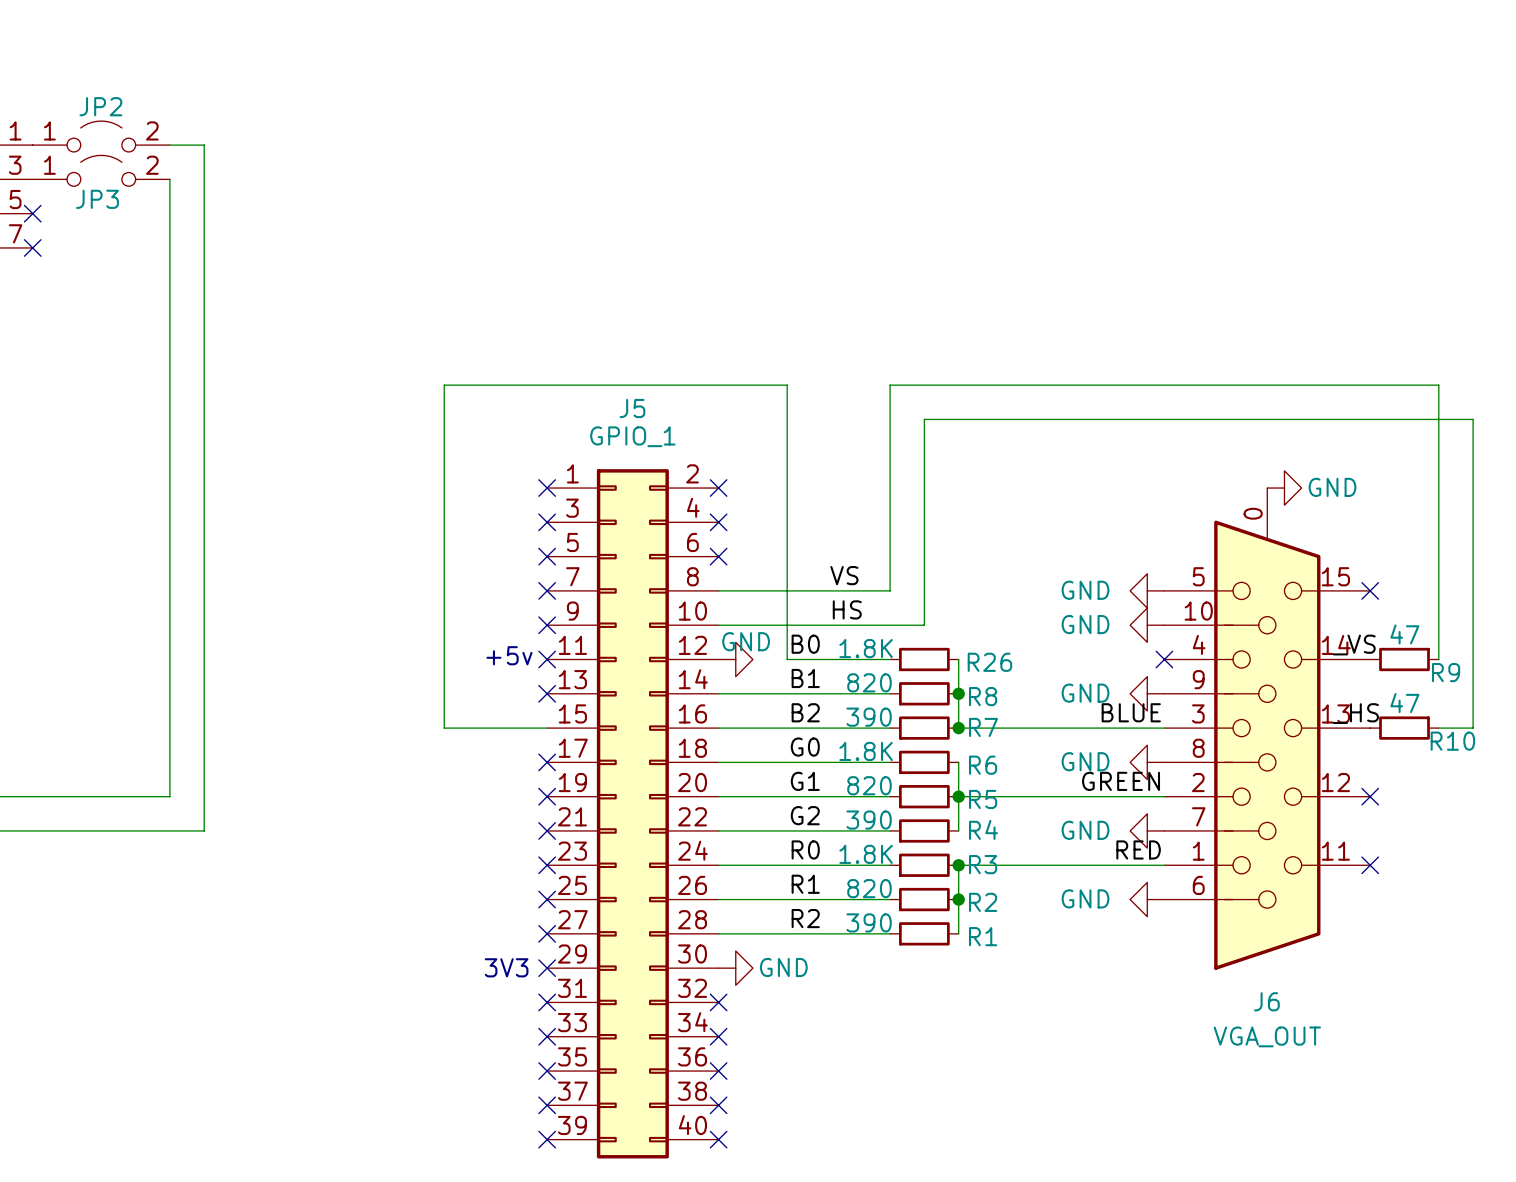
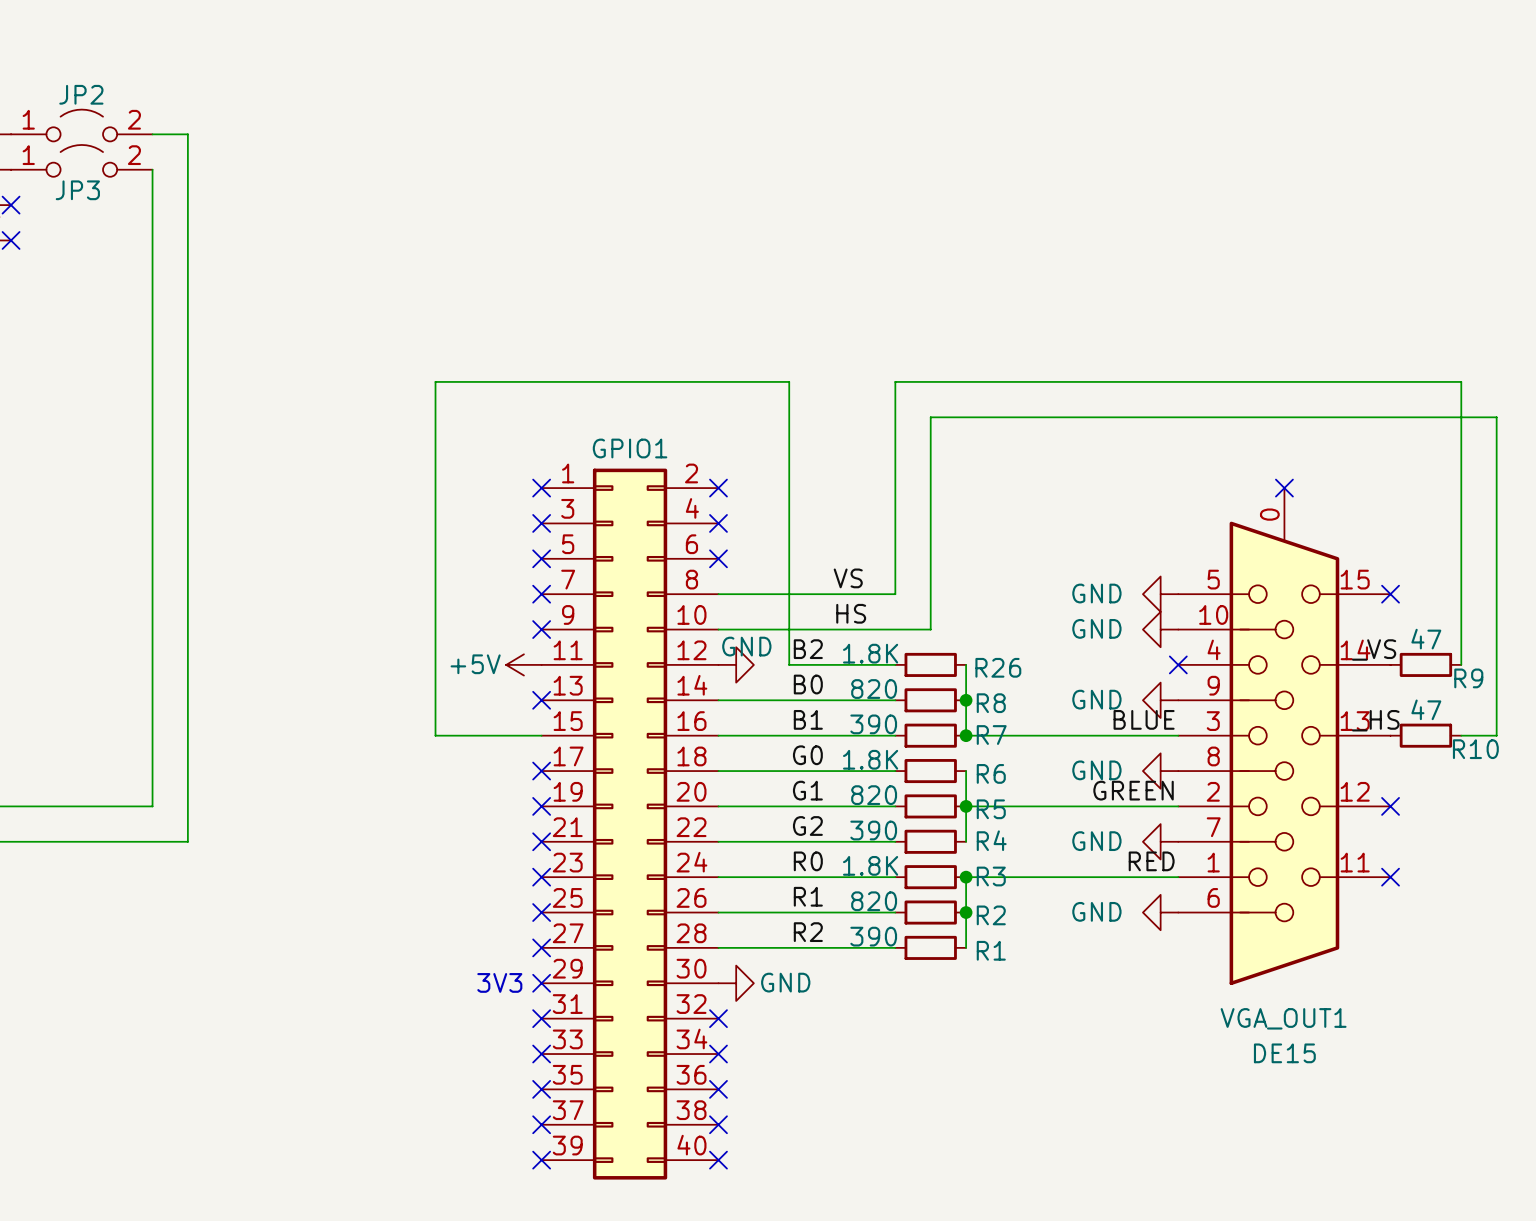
J5 name: J5 (632, 408) -> GPIO1 (630, 448)
J5 value: GPIO_1 (632, 436) -> none
no-connect mark: none -> (1284, 488)
power symbol: GND (1284, 488) -> none
label: B0 (805, 644) -> B2 (808, 649)
text: +5v (509, 655) -> none
power symbol: none -> +5V (523, 664)
no-connect mark: (547, 659) -> none
label: B1 (805, 678) -> B0 (808, 684)
label: B2 (805, 712) -> B1 (808, 719)
J6 name: J6 (1266, 1001) -> VGA_OUT1 (1283, 1018)
J6 value: VGA_OUT (1267, 1036) -> DE15 (1284, 1053)

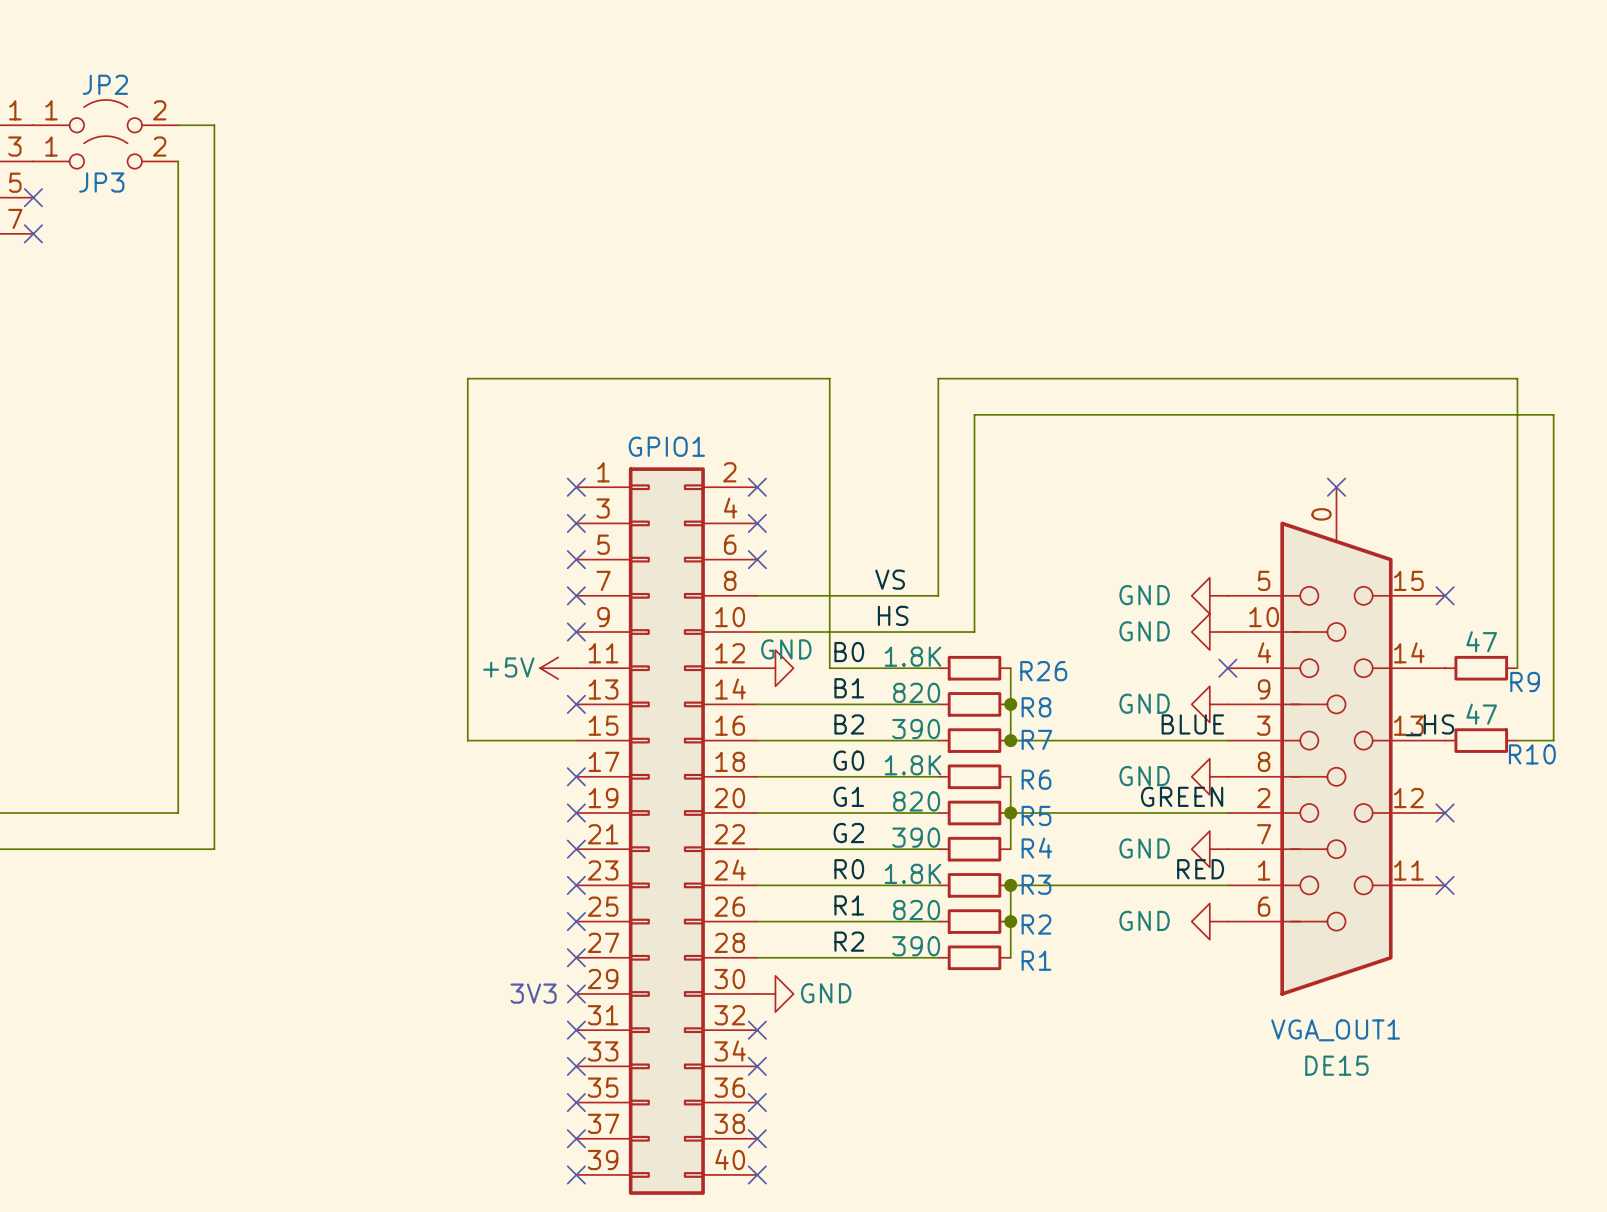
label: B2 (808, 649) -> B0 (849, 652)
label: _VS (1374, 649) -> none
label: B0 (808, 684) -> B1 (849, 688)
label: B1 (808, 719) -> B2 (849, 724)

